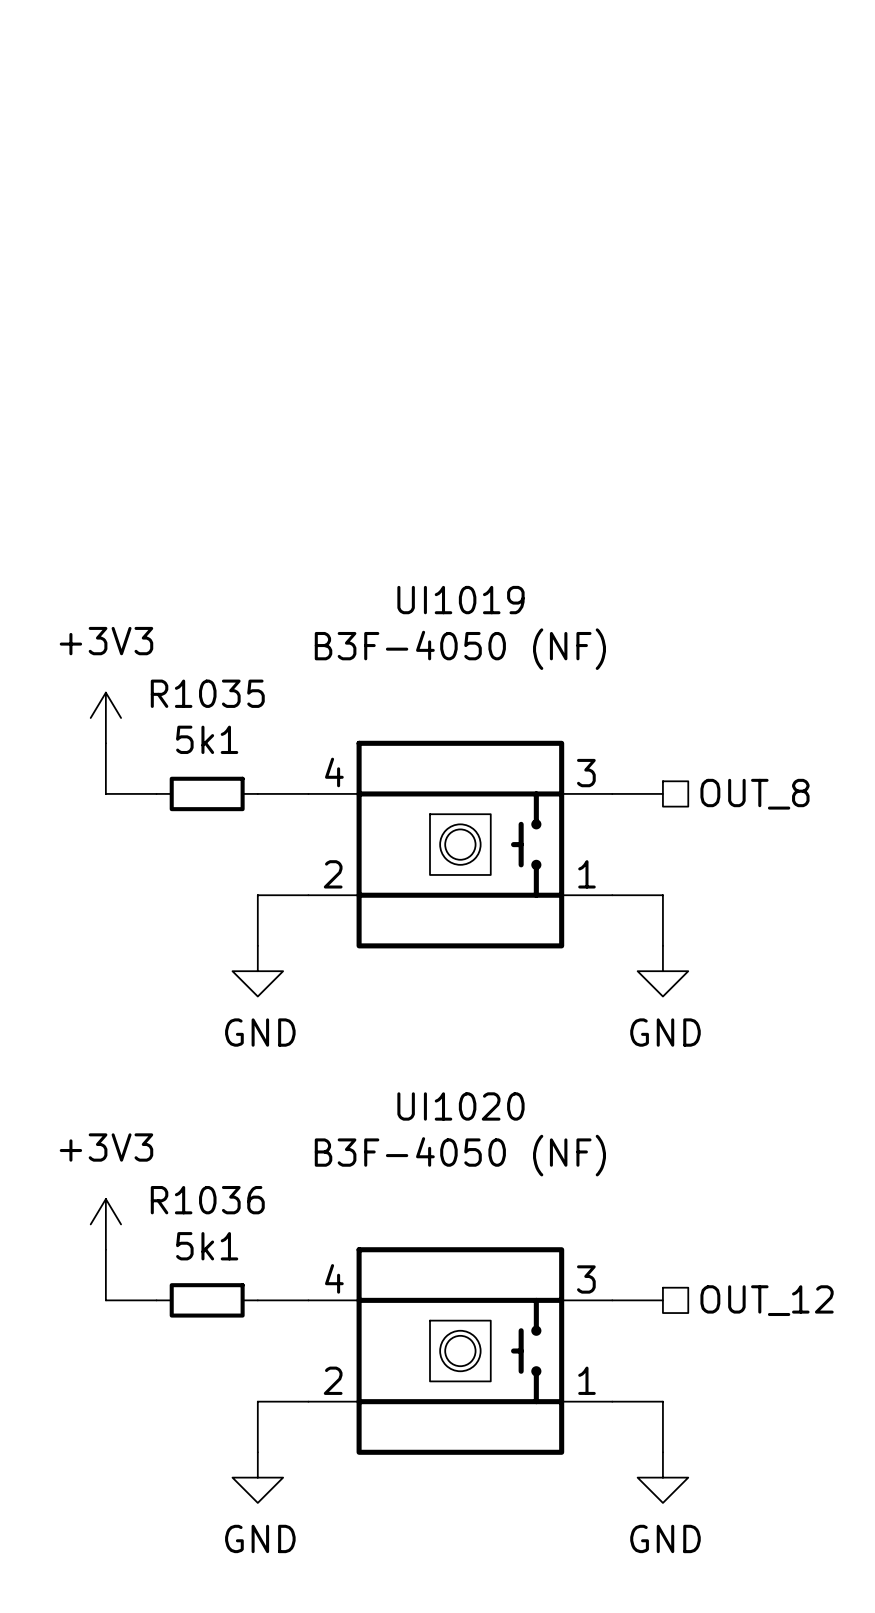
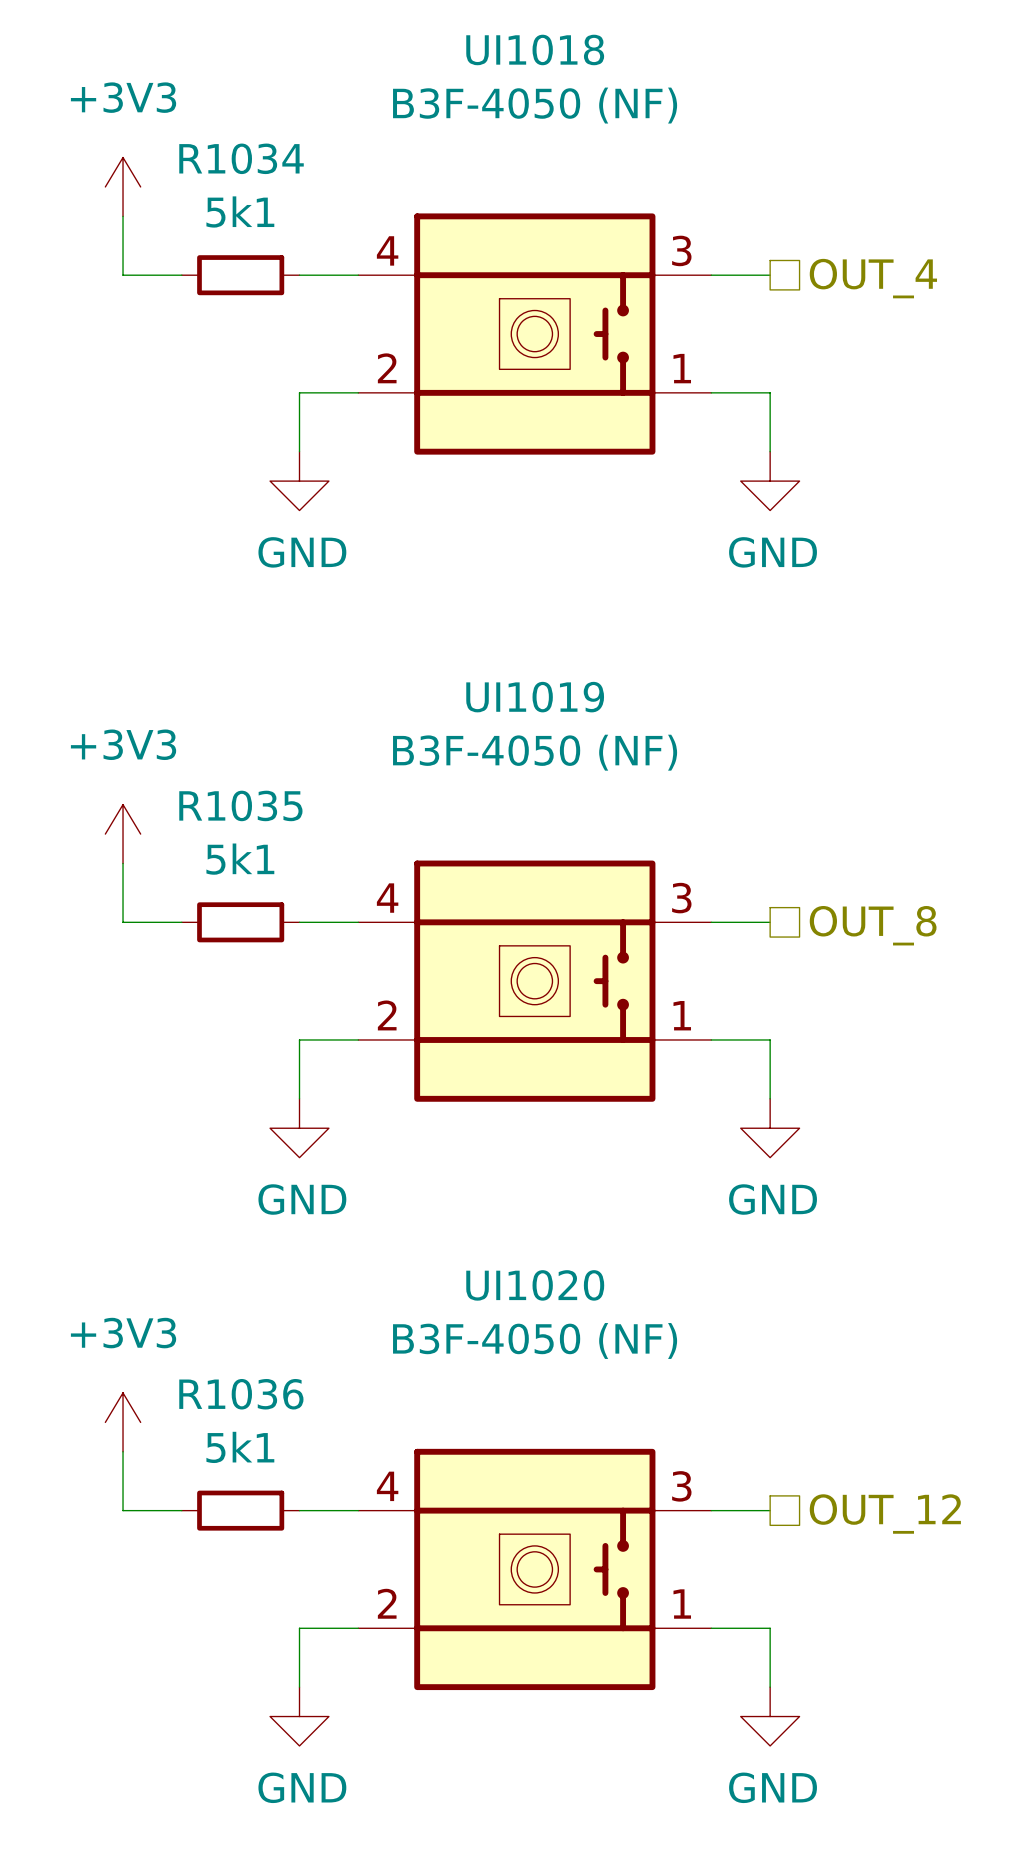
power symbol: none -> +3V3 (123, 186)
wire: none -> (123, 216) (123, 275) (181, 275)
R1034: none -> 5k1 (240, 275)
wire: none -> (299, 275) (358, 275)
wire: none -> (711, 275) (770, 275)
hierarchical label: none -> OUT_4 (873, 278)
UI1018: none -> B3F-4050 (NF) (534, 334)
wire: none -> (358, 392) (299, 392) (299, 451)
wire: none -> (711, 392) (770, 392) (770, 451)
power symbol: none -> GND (299, 481)
power symbol: none -> GND (770, 481)

